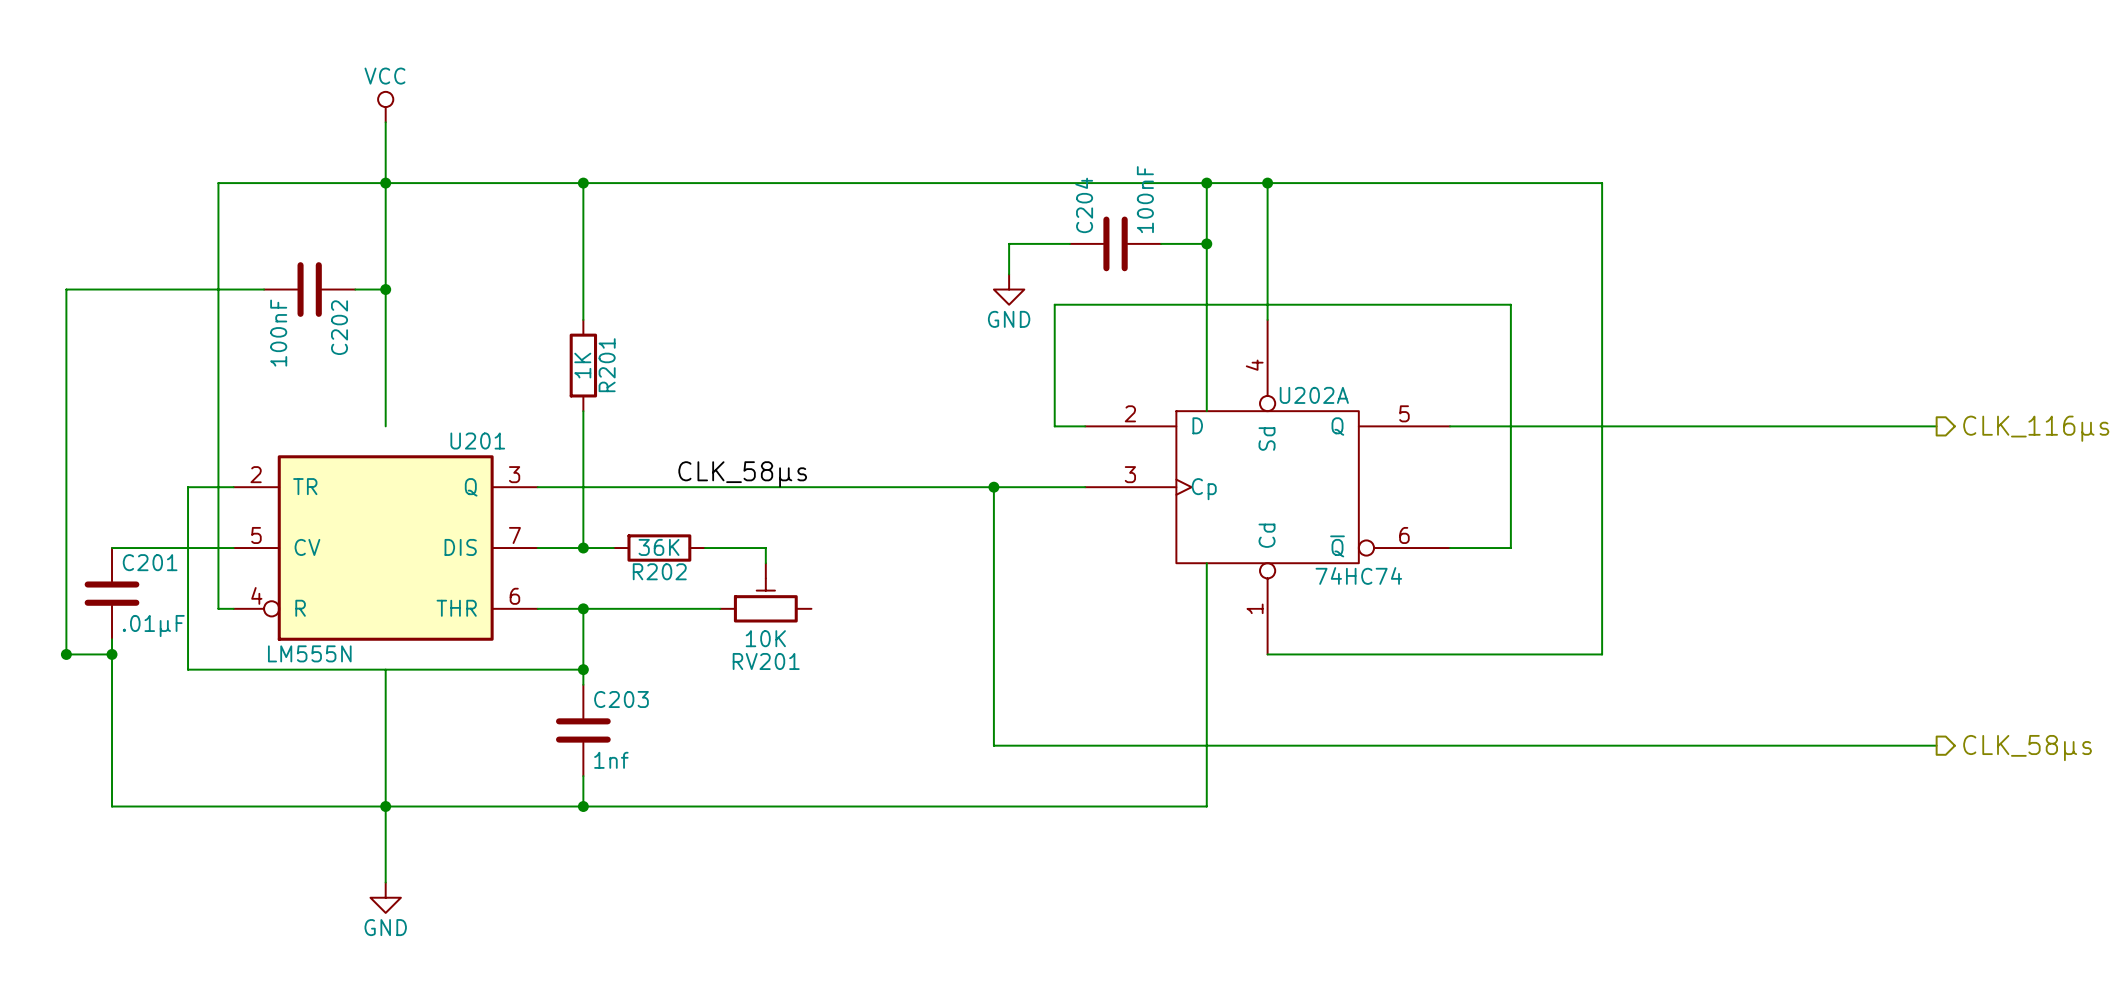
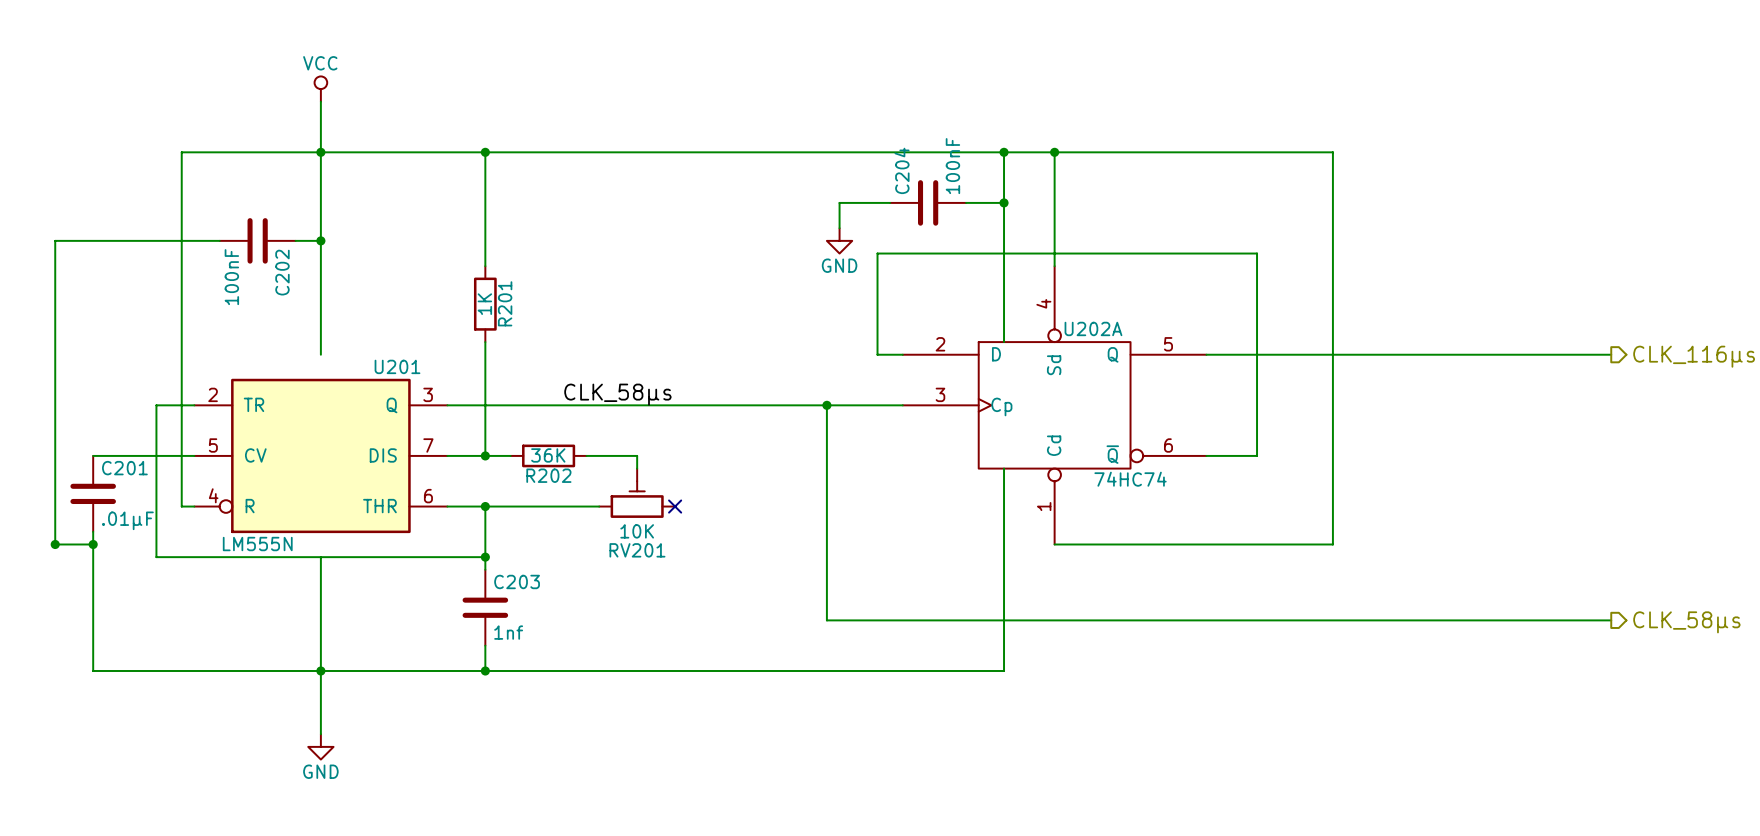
no-connect mark: none -> (675, 506)

